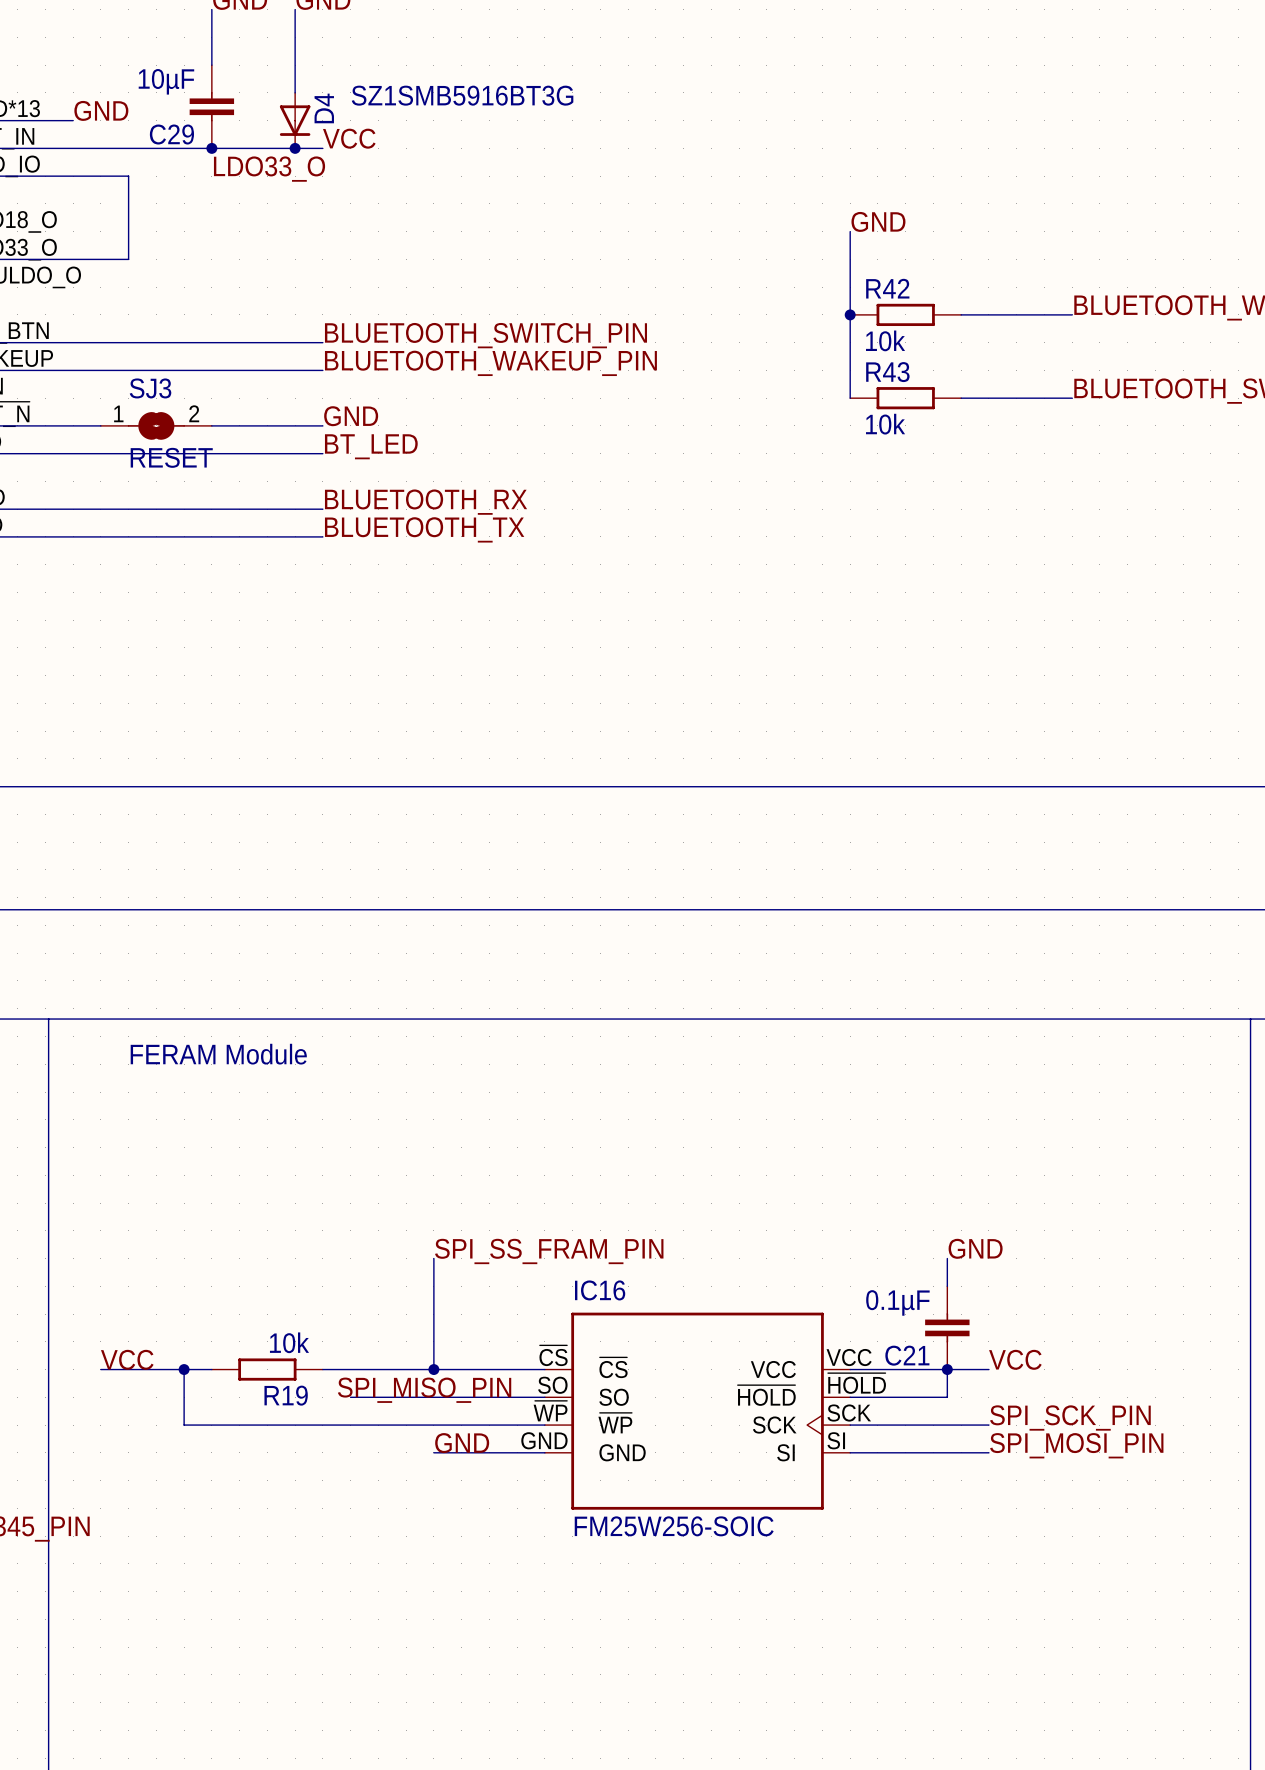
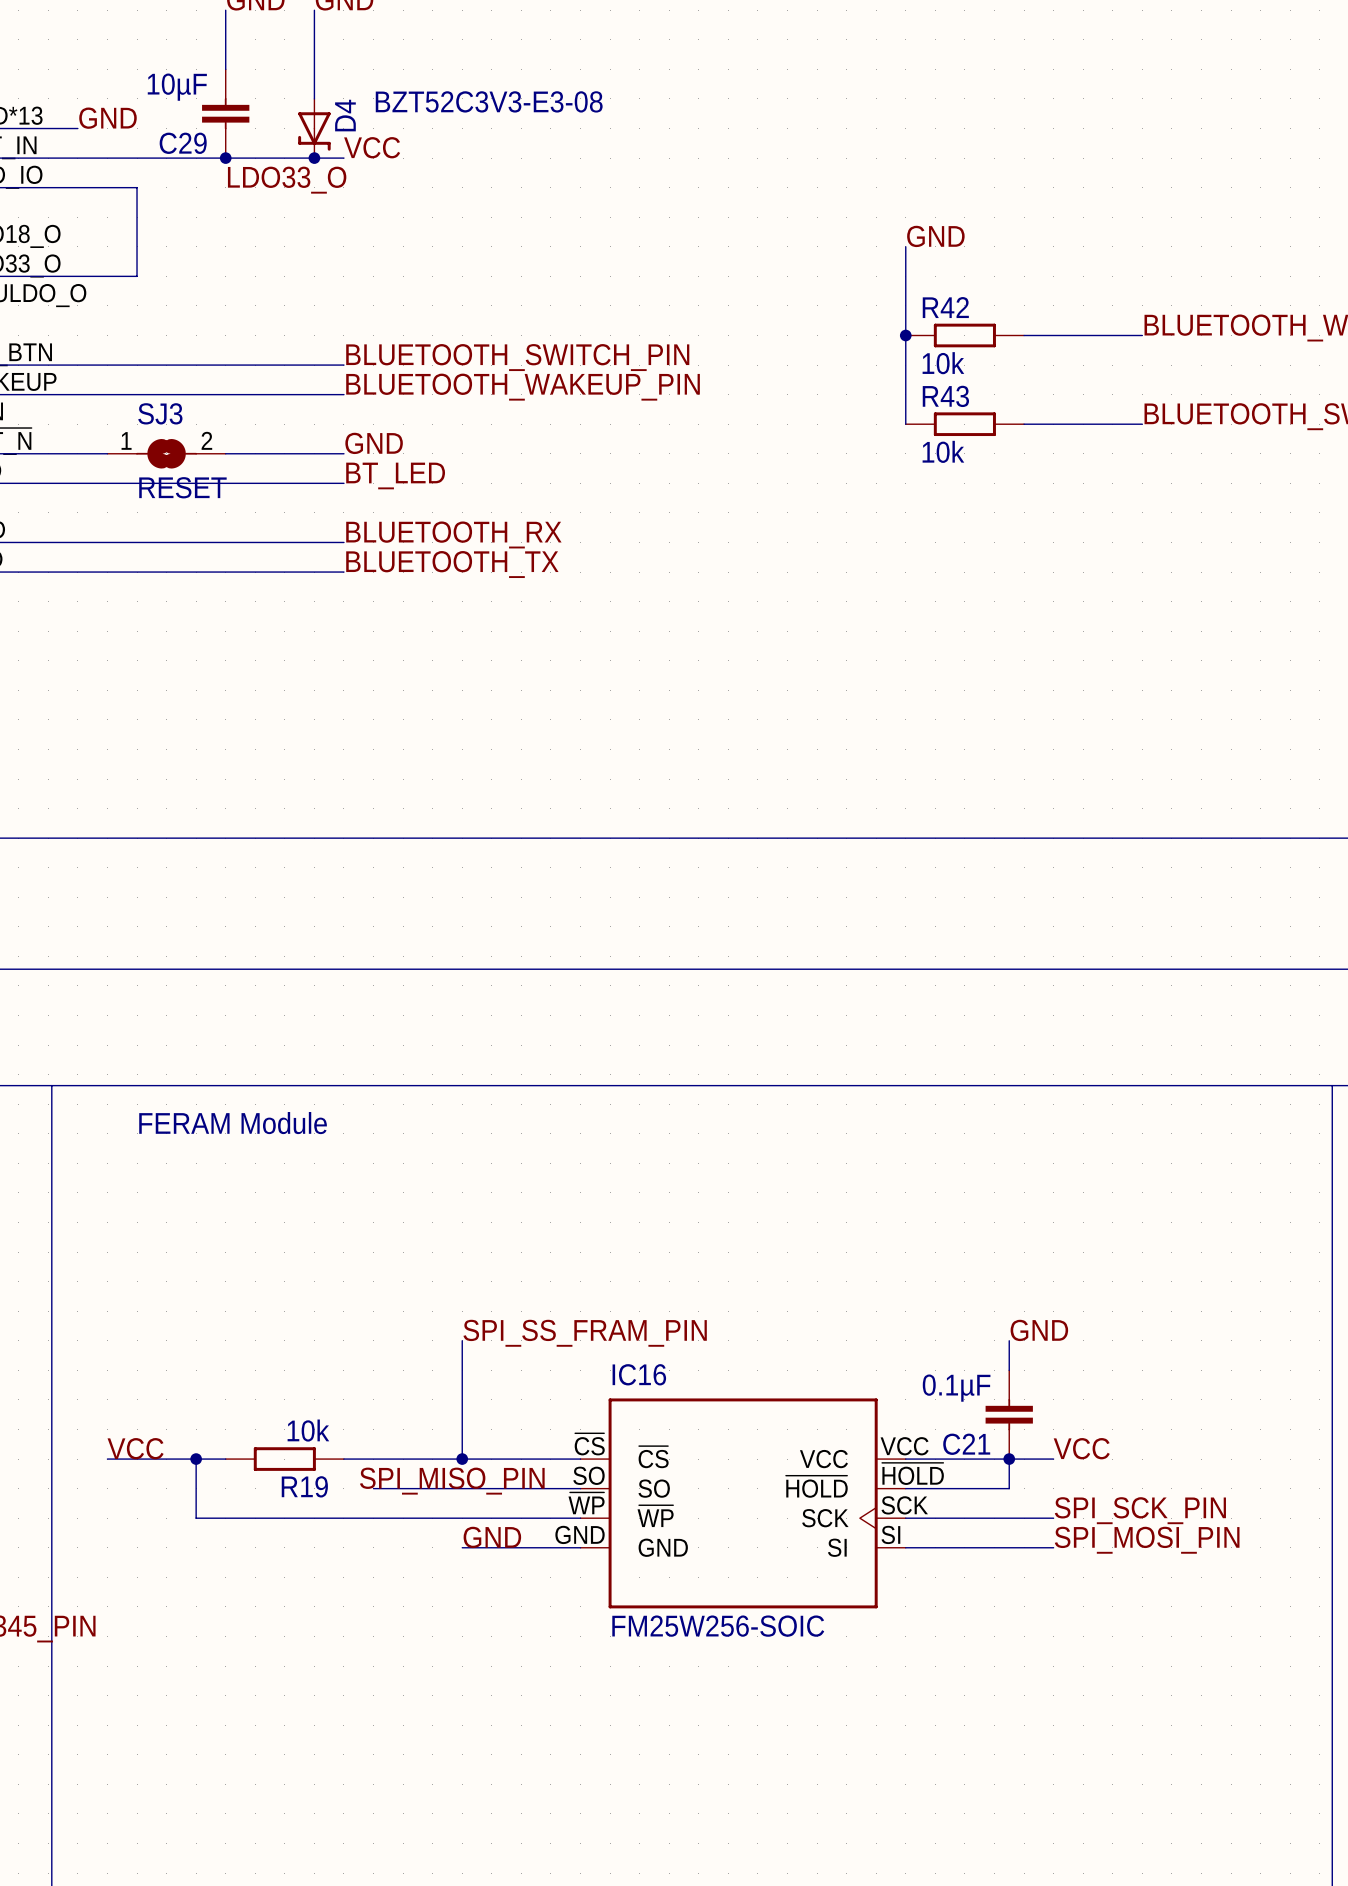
D4 symbol: [279, 92, 311, 149] -> [298, 98, 331, 159]
D4 value: SZ1SMB5916BT3G (462, 95) -> BZT52C3V3-E3-08 (489, 101)

